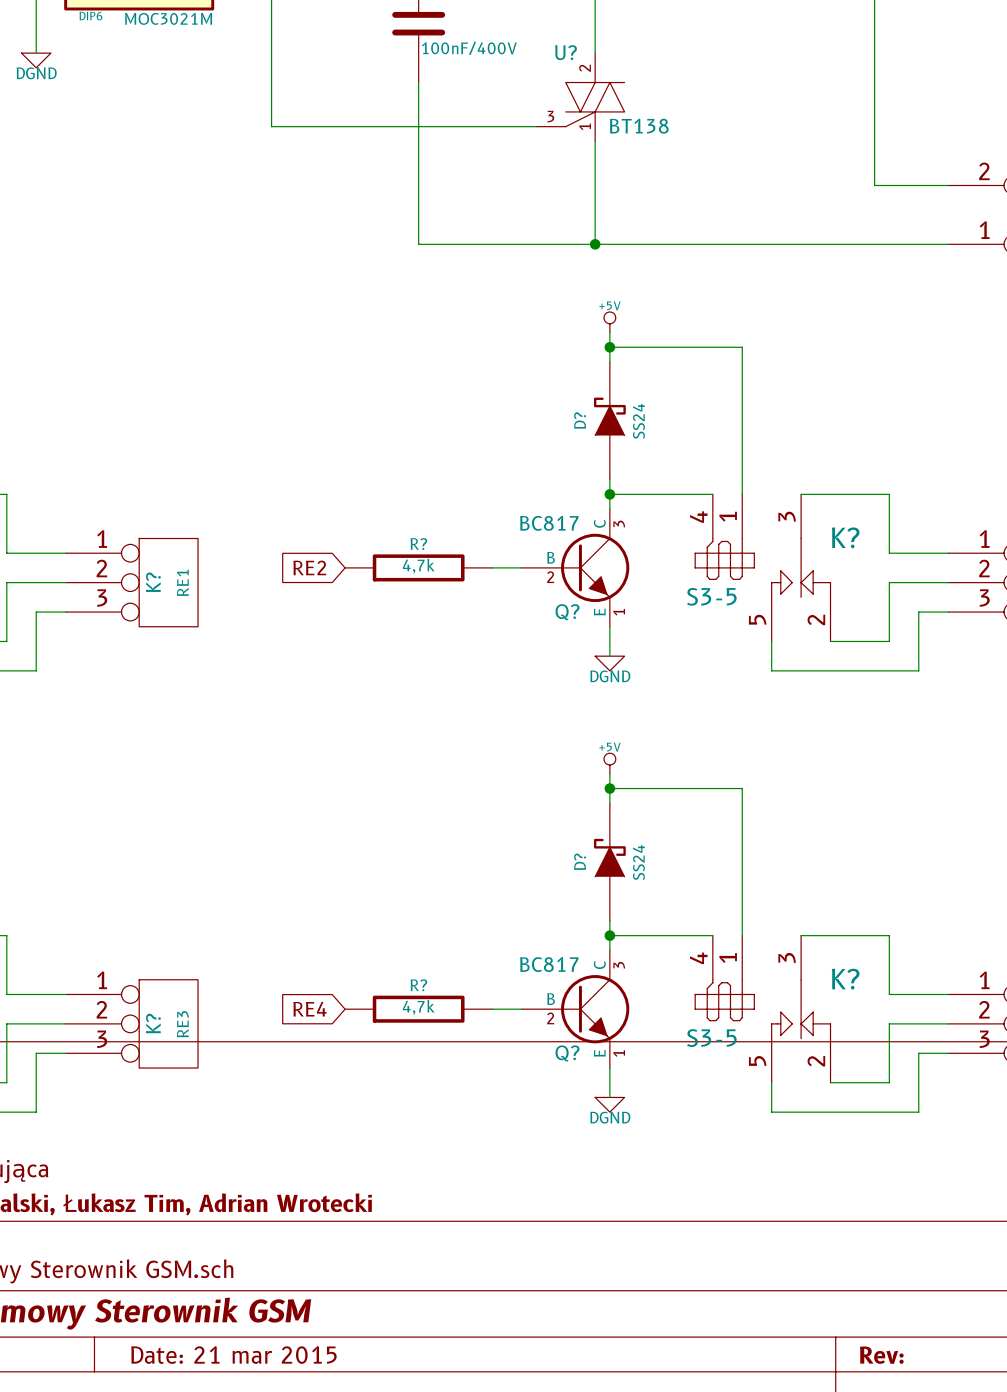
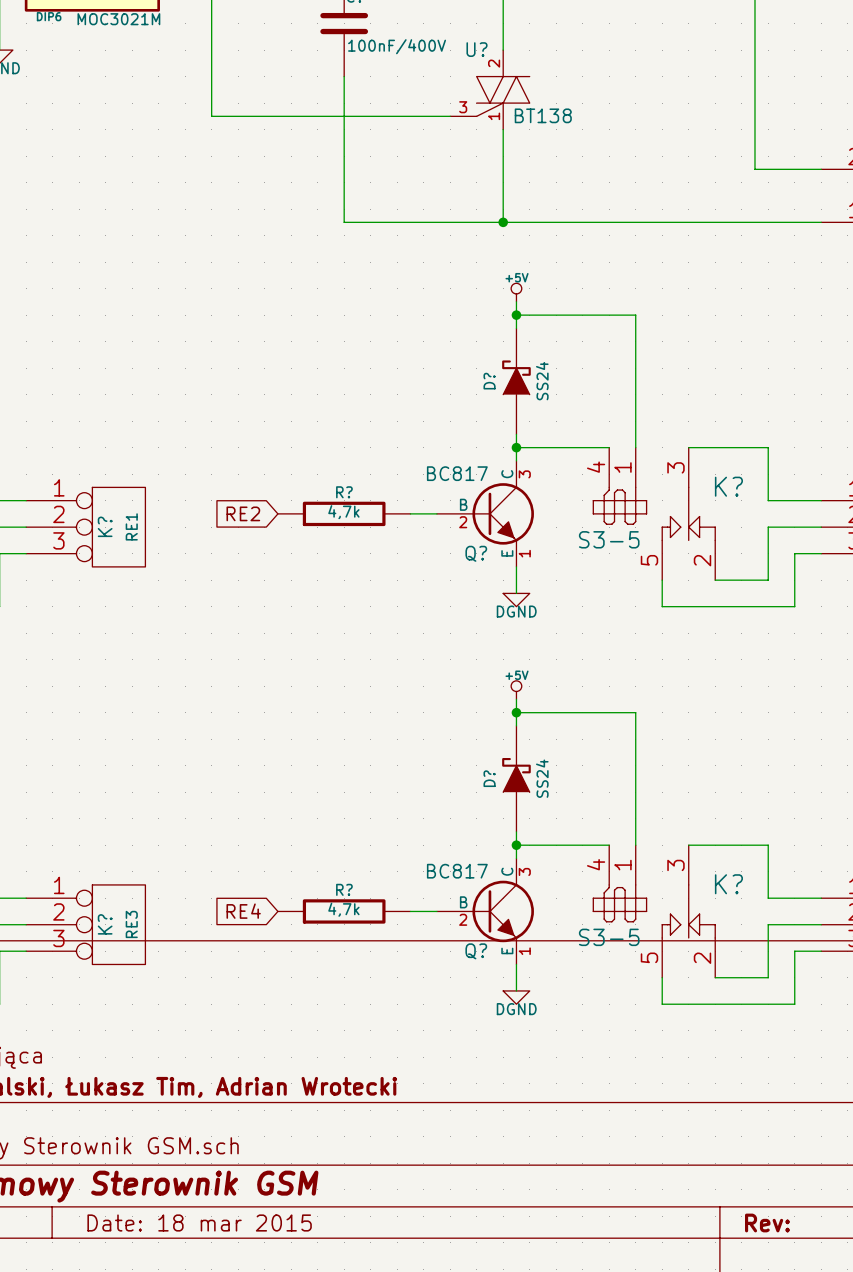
title block: Date: 21 mar 2015 (233, 1355) -> Date: 18 mar 2015 (199, 1222)

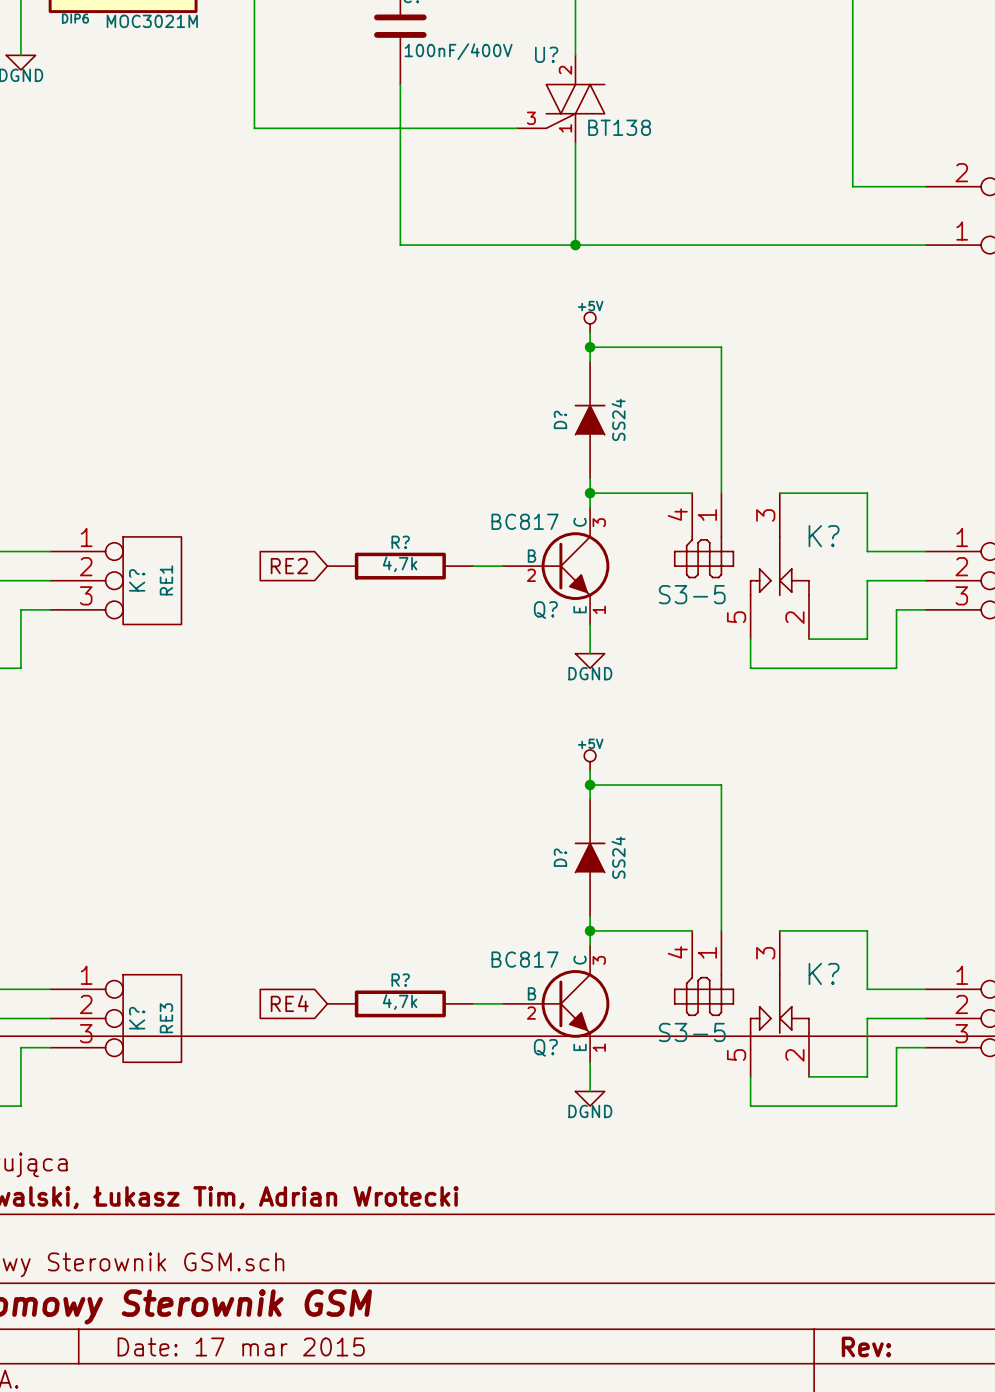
D? symbol: [502, 328, 531, 435] -> [574, 361, 606, 479]
D? symbol: [502, 725, 531, 832] -> [574, 799, 606, 917]
title block: Date: 18 mar 2015 (199, 1222) -> Date: 17 mar 2015 (241, 1346)

